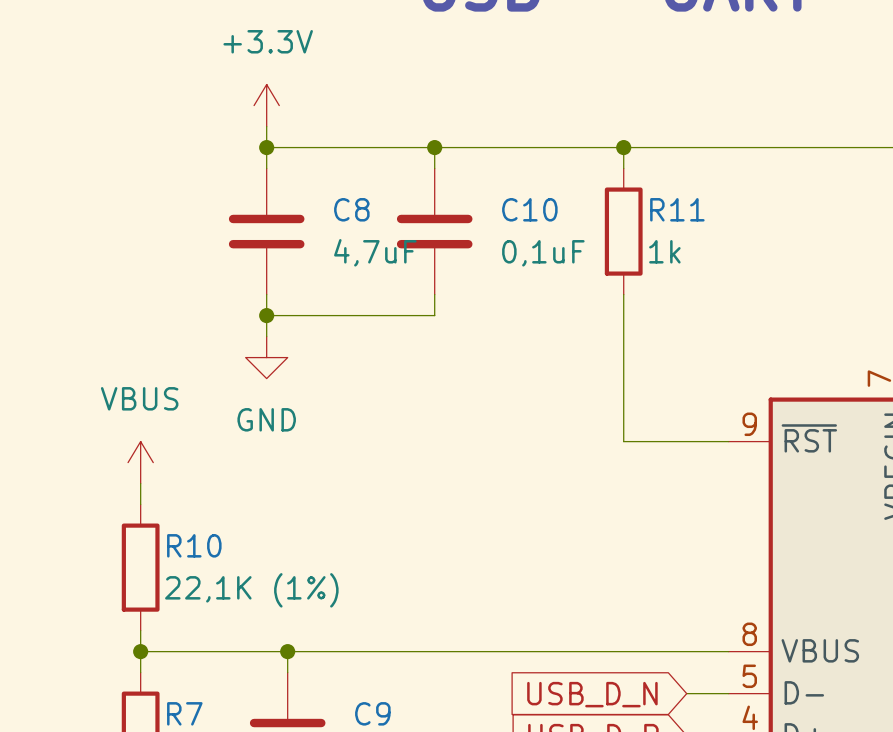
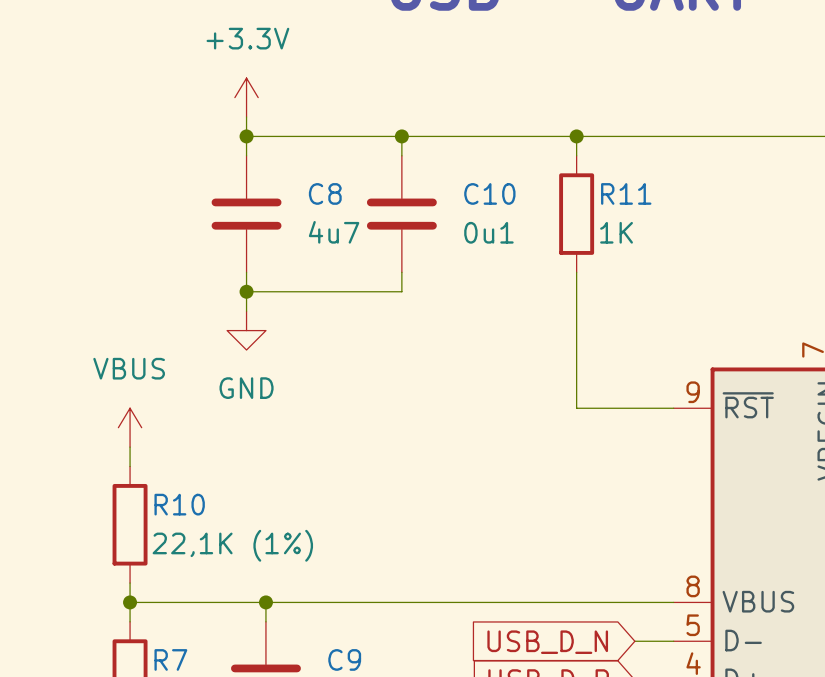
R11 value: 1k (664, 251) -> 1K (616, 232)
C8 value: 4,7uF (375, 252) -> 4u7 (334, 232)
C10 value: 0,1uF (543, 253) -> 0u1 (488, 232)

